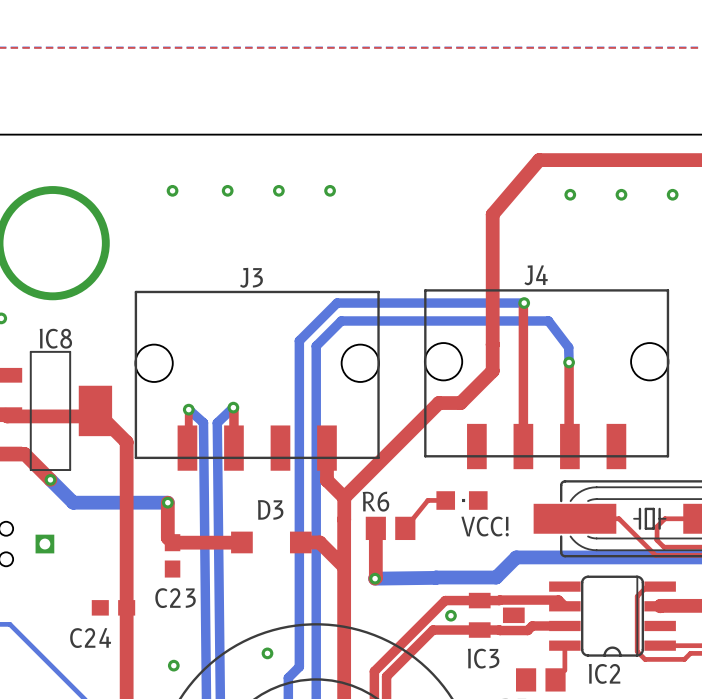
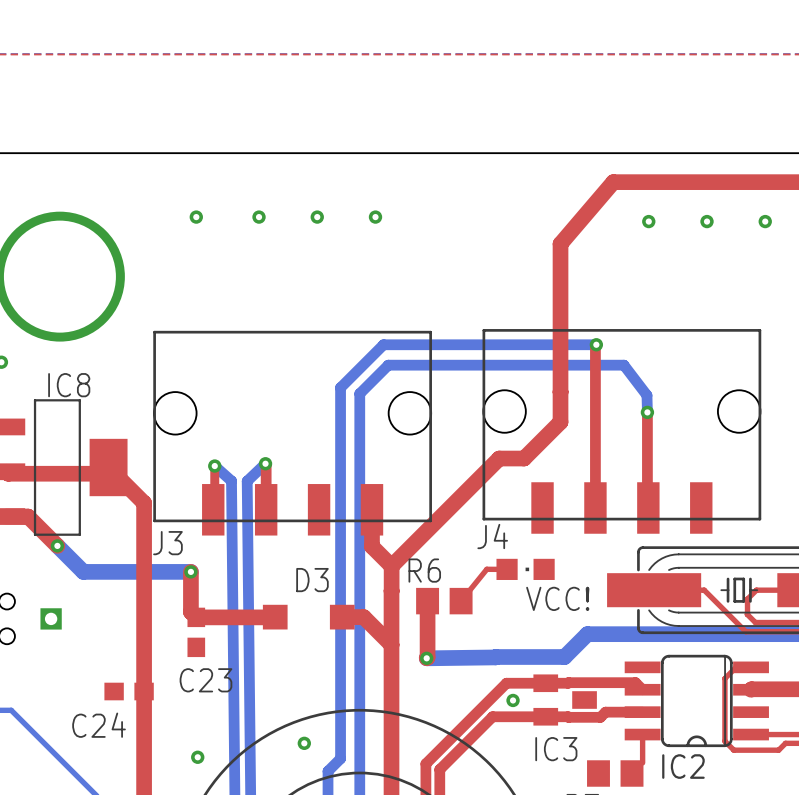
J4 name position: J4 (536, 275) -> J4 (492, 536)
J3 name position: J3 (251, 277) -> J3 (167, 543)

